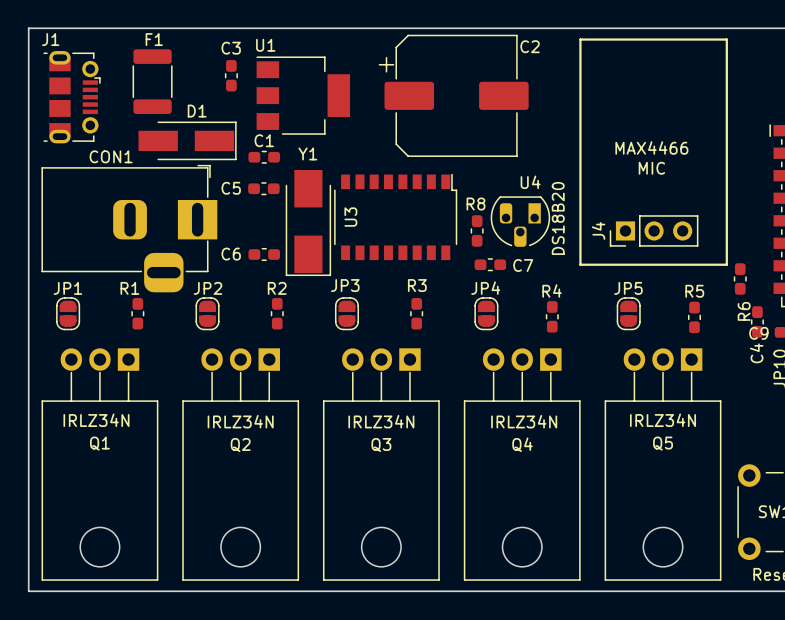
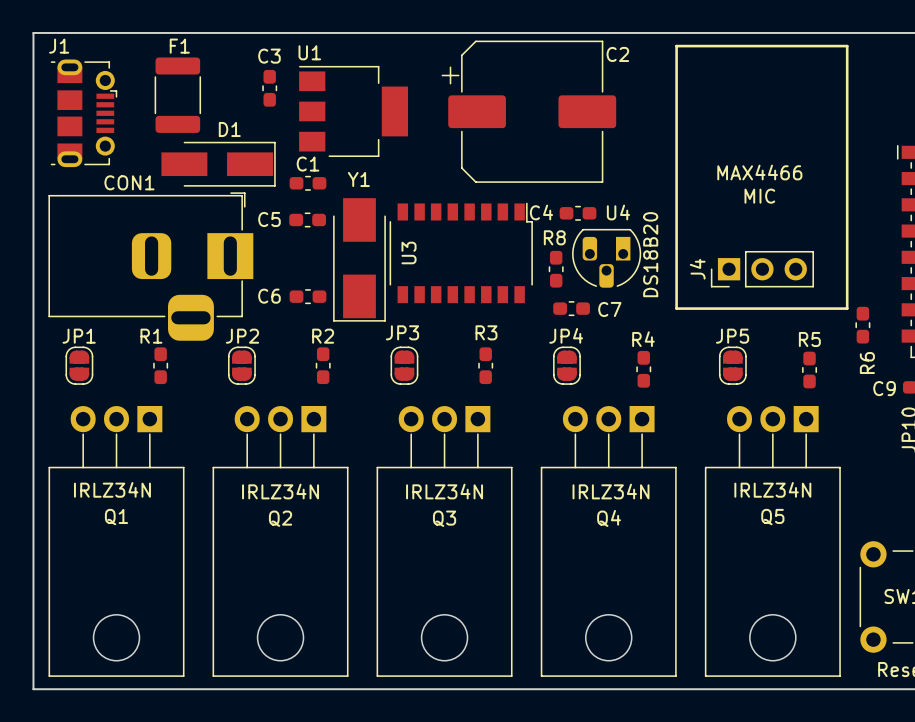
C4 rotation: 0° (757, 321) -> 90° clockwise (578, 213)
C4 position: (757, 321) -> (578, 213)

